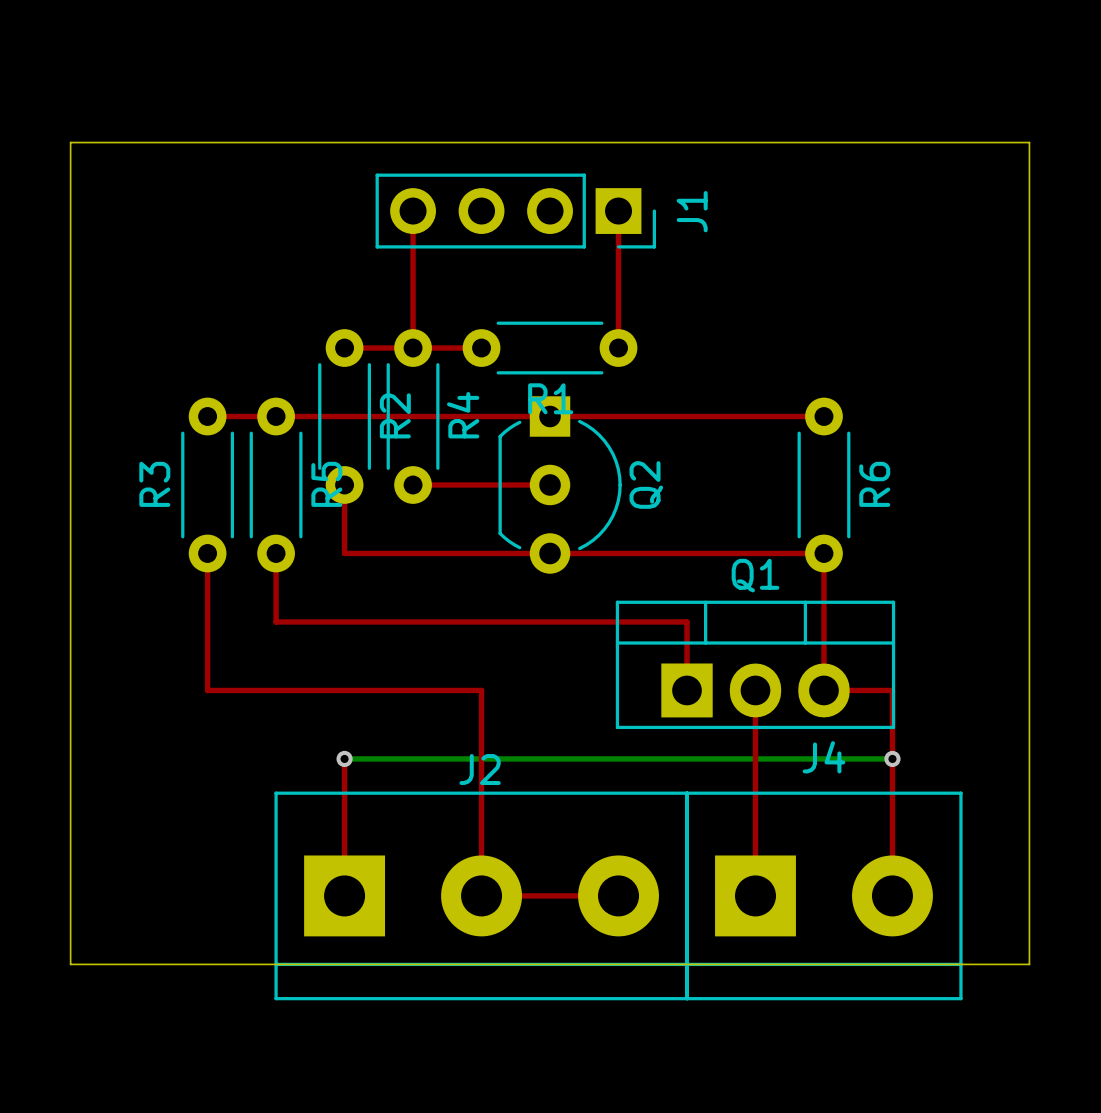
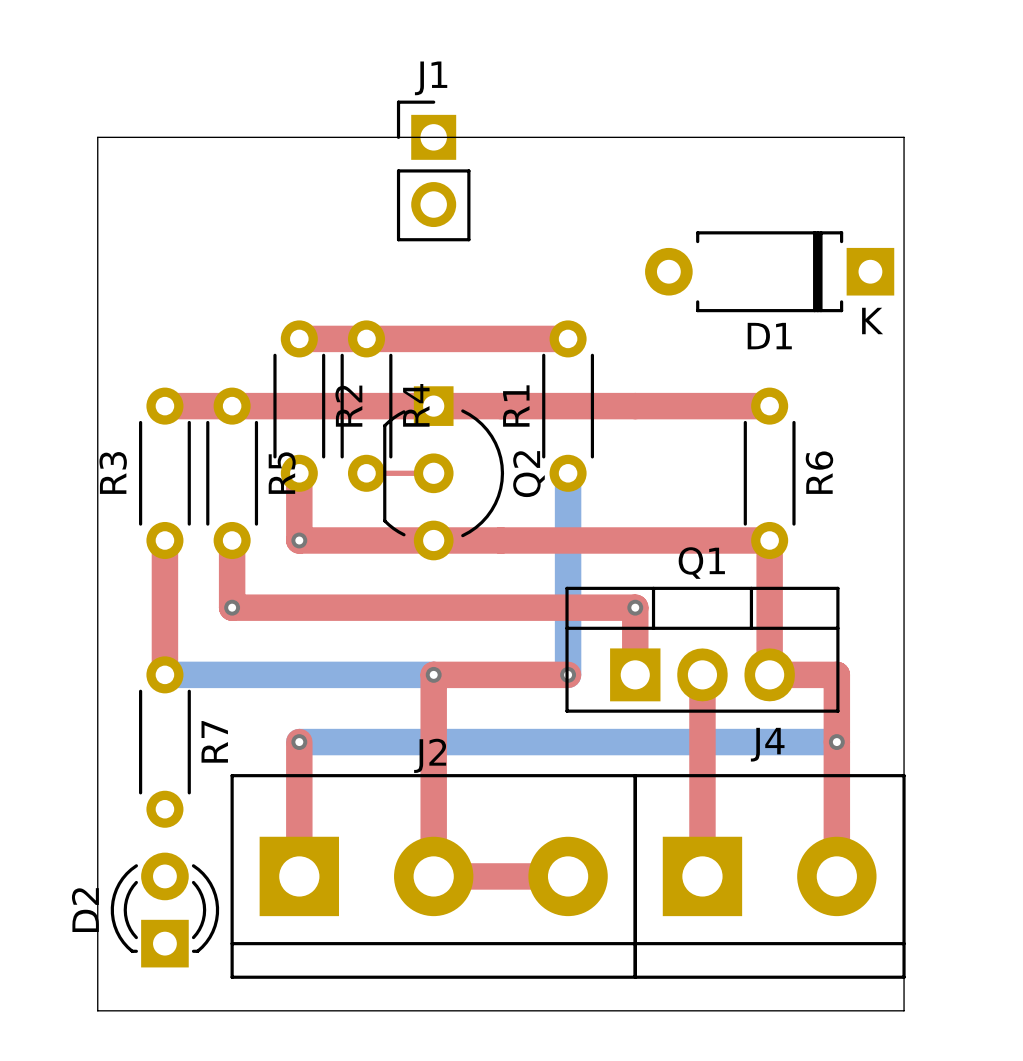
board edge: (139, 142) (70, 142) (70, 964) (1029, 964) (1029, 142) (960, 142) -> (97, 137) (97, 1010) (904, 1010) (904, 137)
J1 footprint: [375, 173, 657, 249] -> [396, 100, 471, 242]
top track: (413, 211) (413, 348) -> none
top track: (618, 211) (618, 348) -> (433, 338) (568, 338)
J1 name position: J1 (692, 211) -> J1 (431, 78)
D1: none -> (769, 271)
top track width: thin (344, 348) (481, 348) -> thick (299, 338) (433, 338)
R1 rotation: 0° (550, 348) -> 90° clockwise (568, 406)
top track width: thin (207, 416) (823, 416) -> thick (164, 406) (769, 406)
top track width: thin (344, 484) (344, 553) (823, 553) (823, 690) (892, 690) (892, 895) -> thick (299, 473) (299, 540) (769, 540) (769, 674) (836, 674) (836, 876)
top track: (481, 484) (550, 484) -> none
Q2 position: (560, 484) -> (443, 473)
bottom track: none -> (568, 473) (568, 674)
top track width: thin (207, 553) (207, 690) -> thick (164, 540) (164, 674)
top track width: thin (276, 553) (276, 621) (687, 621) (687, 690) -> thick (232, 540) (232, 607) (635, 607) (635, 674)
via: none -> (299, 540)
via: none -> (232, 607)
via: none -> (635, 607)
top track: (207, 690) (481, 690) -> (568, 674) (433, 674)
bottom track: none -> (164, 674) (433, 674)
top track width: thin (481, 690) (481, 895) (618, 895) -> thick (433, 674) (433, 876) (568, 876)
via: none -> (433, 674)
via: none -> (568, 674)
top track width: thin (755, 690) (755, 895) -> thick (702, 674) (702, 876)
R7: none -> (164, 742)
top track width: thin (344, 758) (344, 895) -> thick (299, 742) (299, 876)
bottom track width: thin (344, 758) (892, 758) -> thick (299, 742) (836, 742)
D2: none -> (164, 910)

